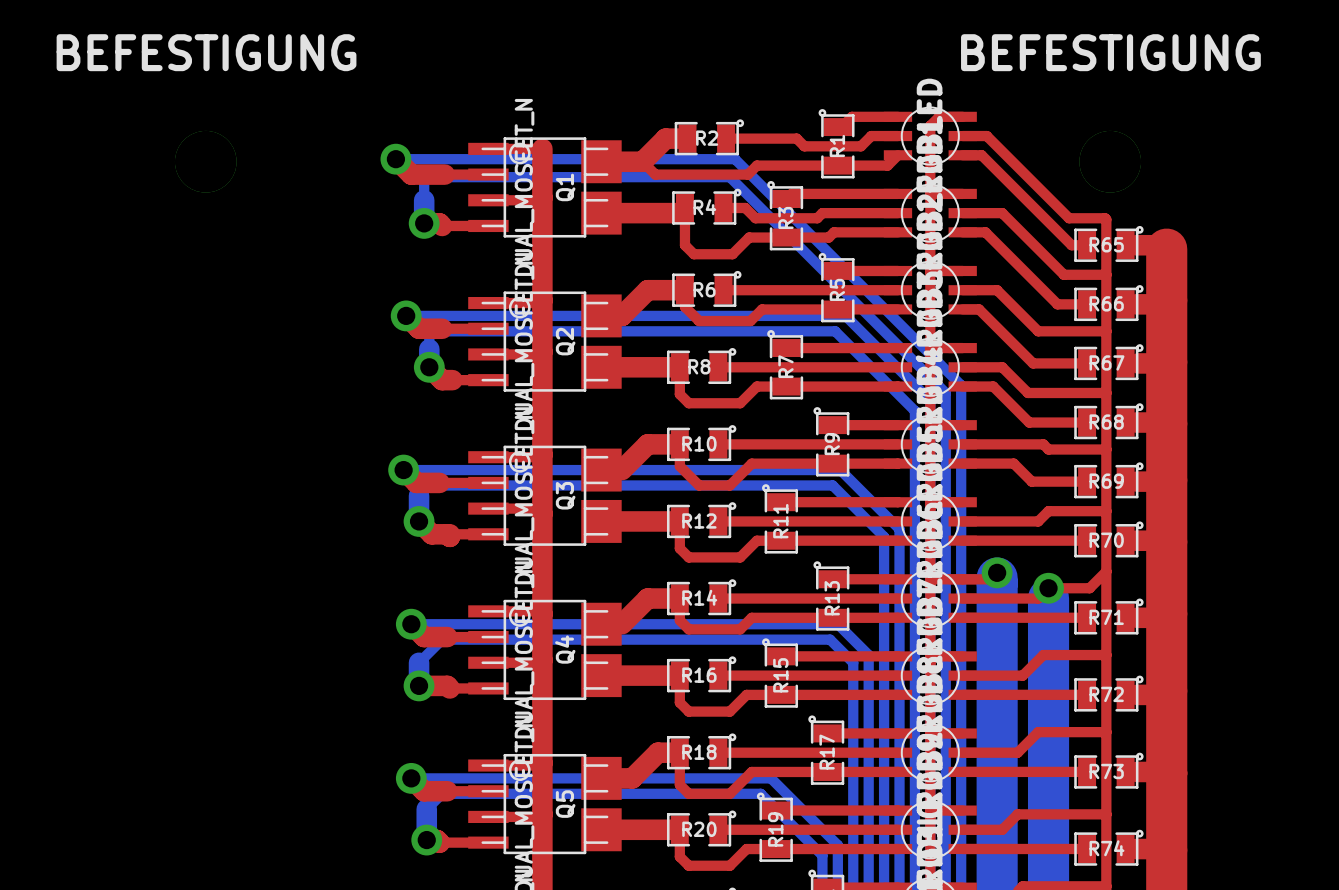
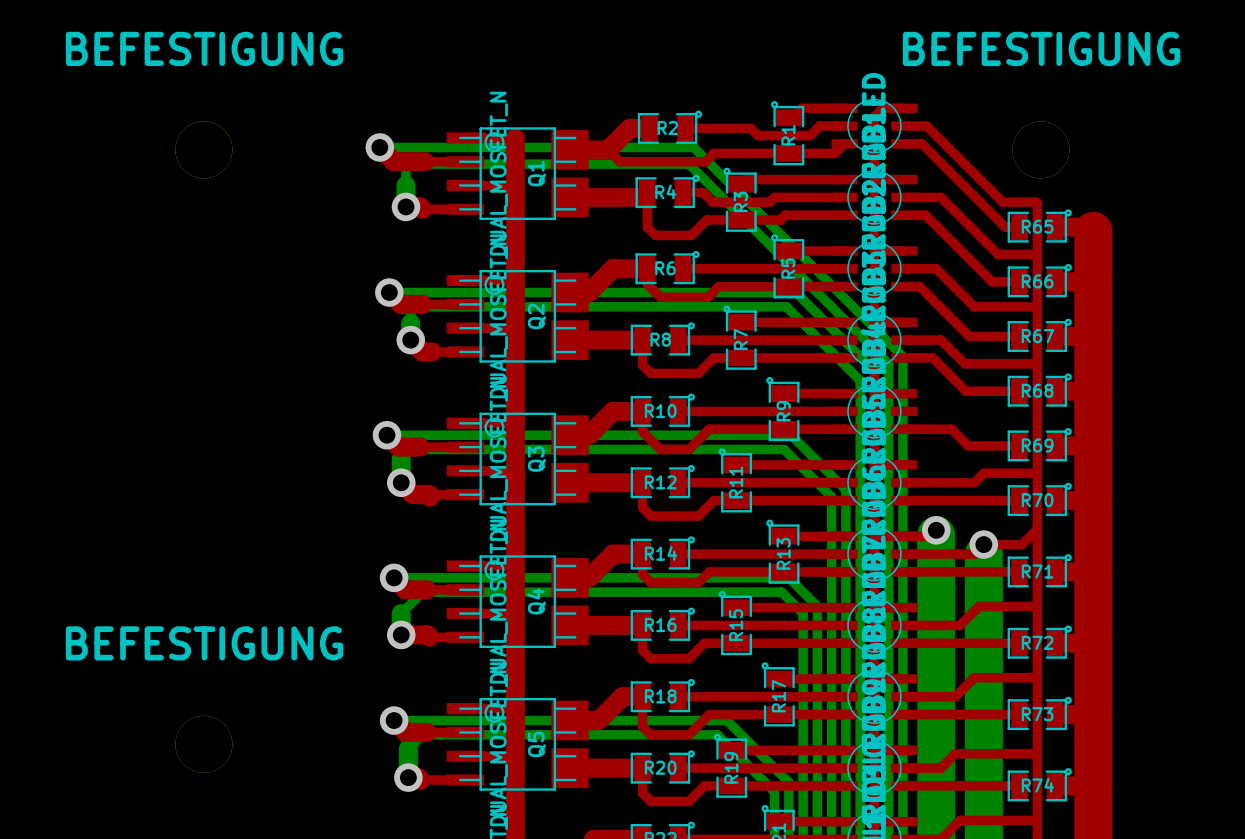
top track: (962, 444) (1043, 444) (1048, 449) (1106, 449) -> none
BEFESTIGUNG: none -> (203, 744)

